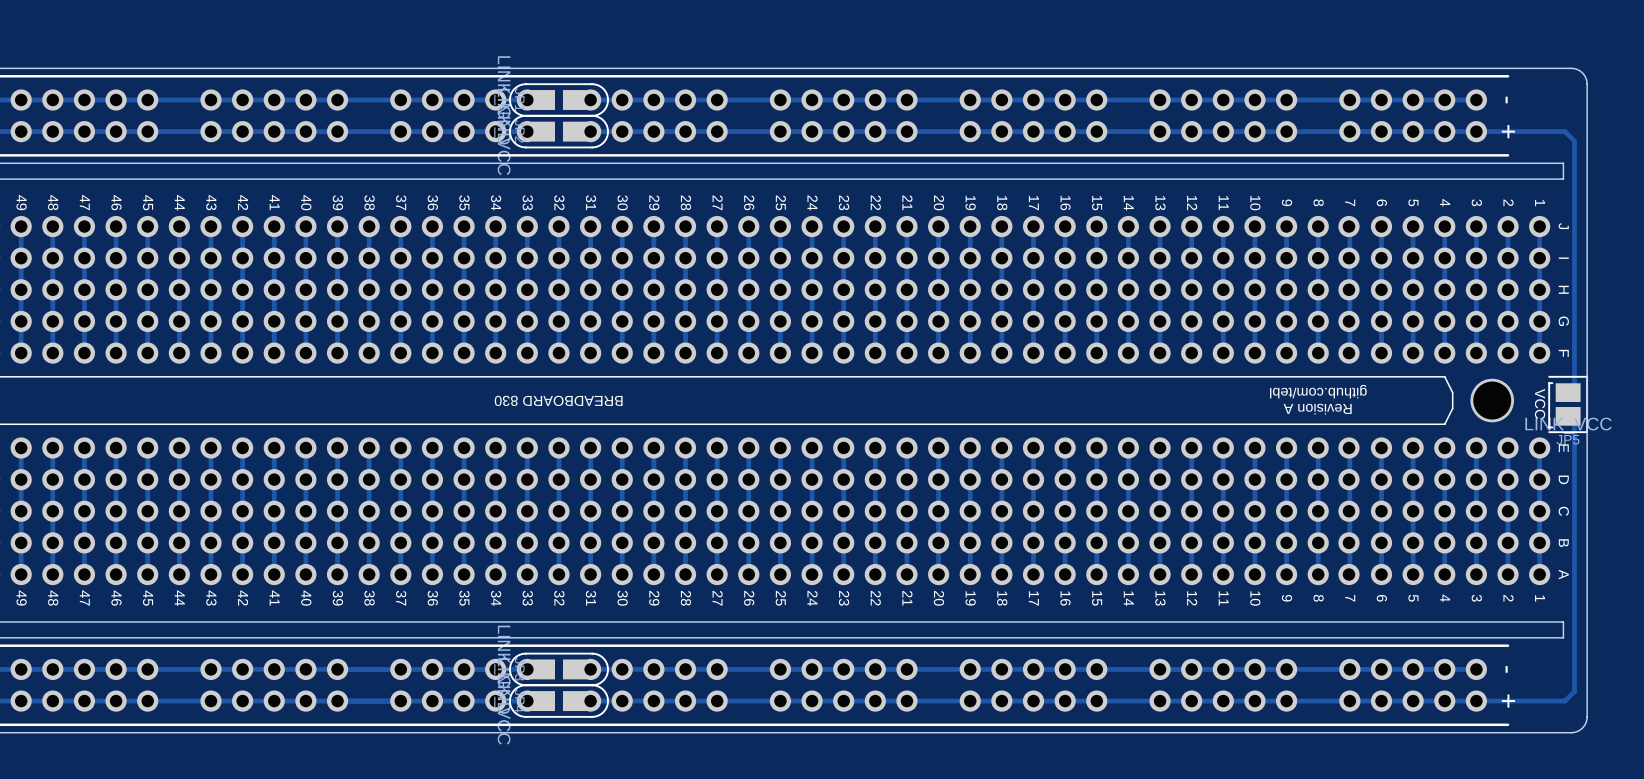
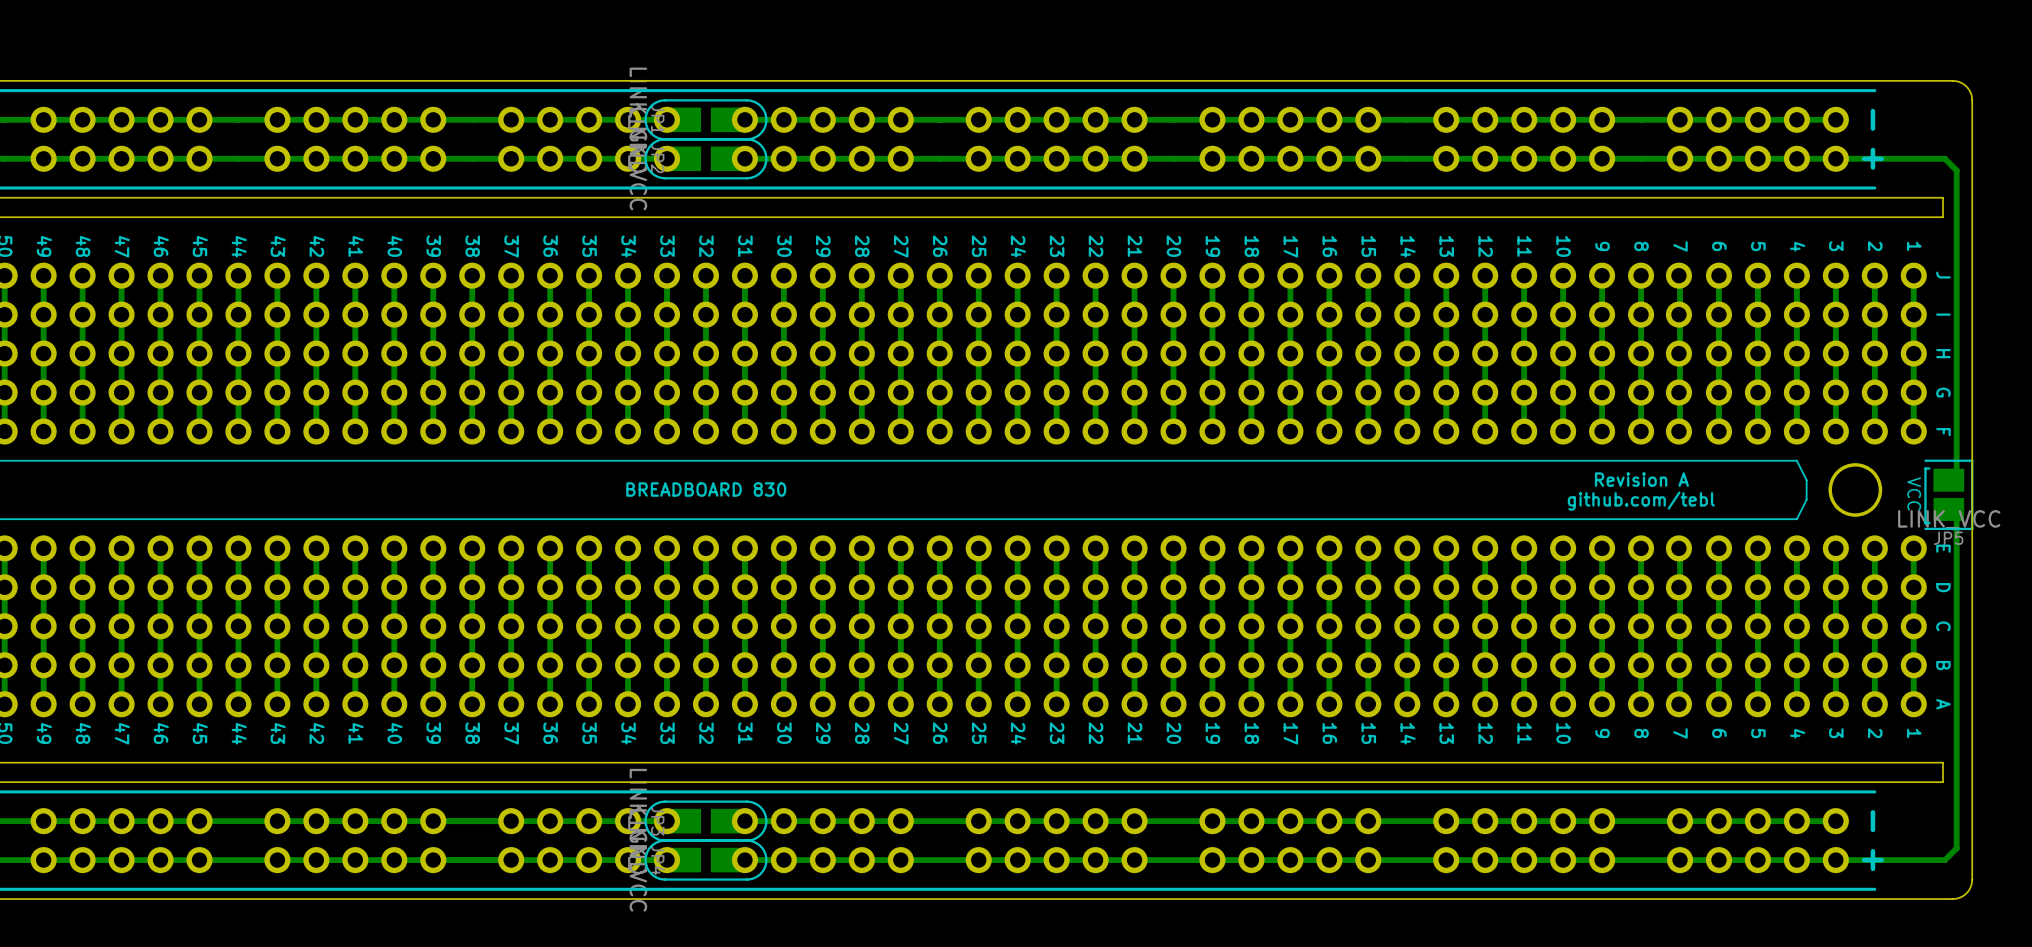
text: github.com/tebl (1318, 391) -> Revision A (1641, 479)
text rotation: 0° (558, 400) -> 180° (706, 489)
text: Revision A (1317, 409) -> github.com/tebl (1641, 501)

